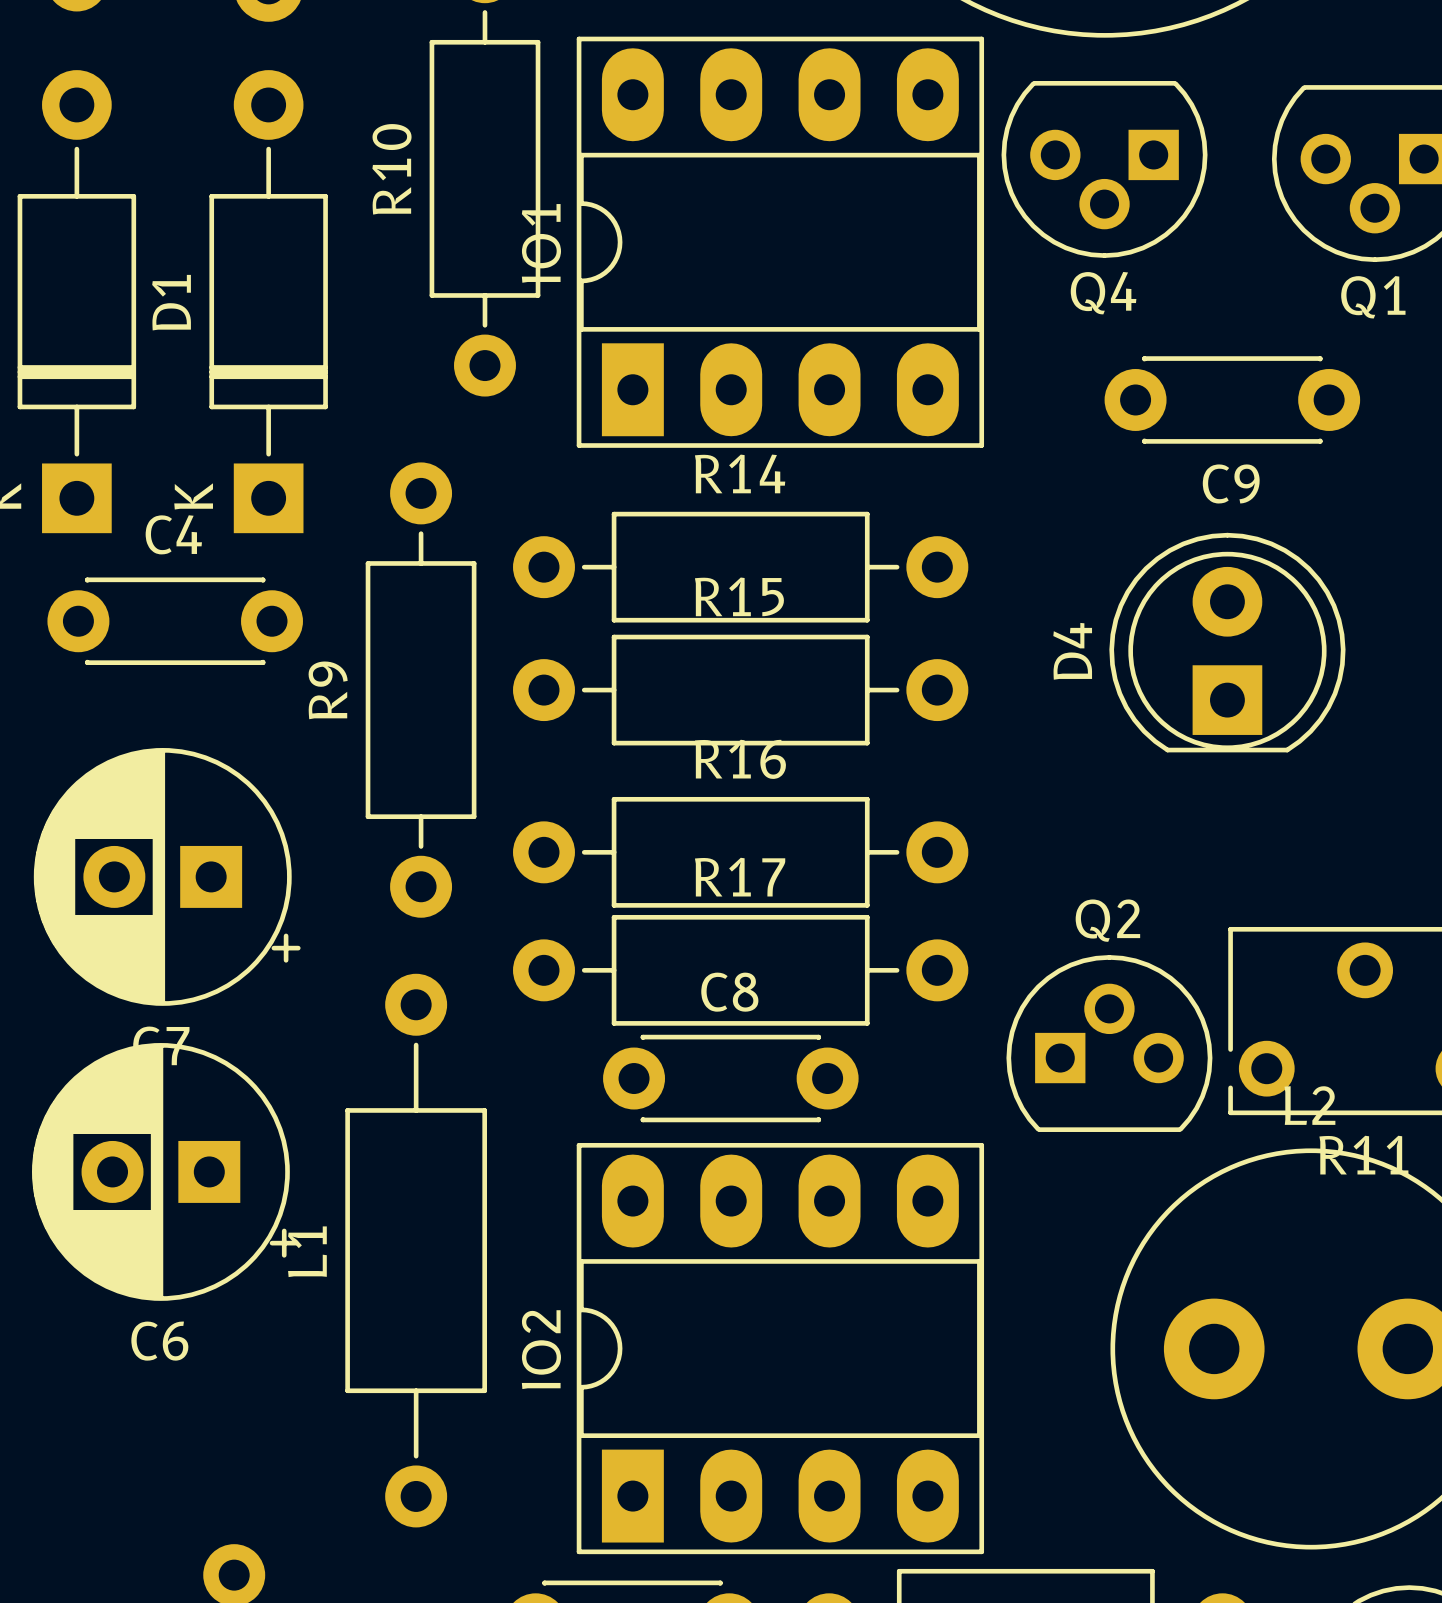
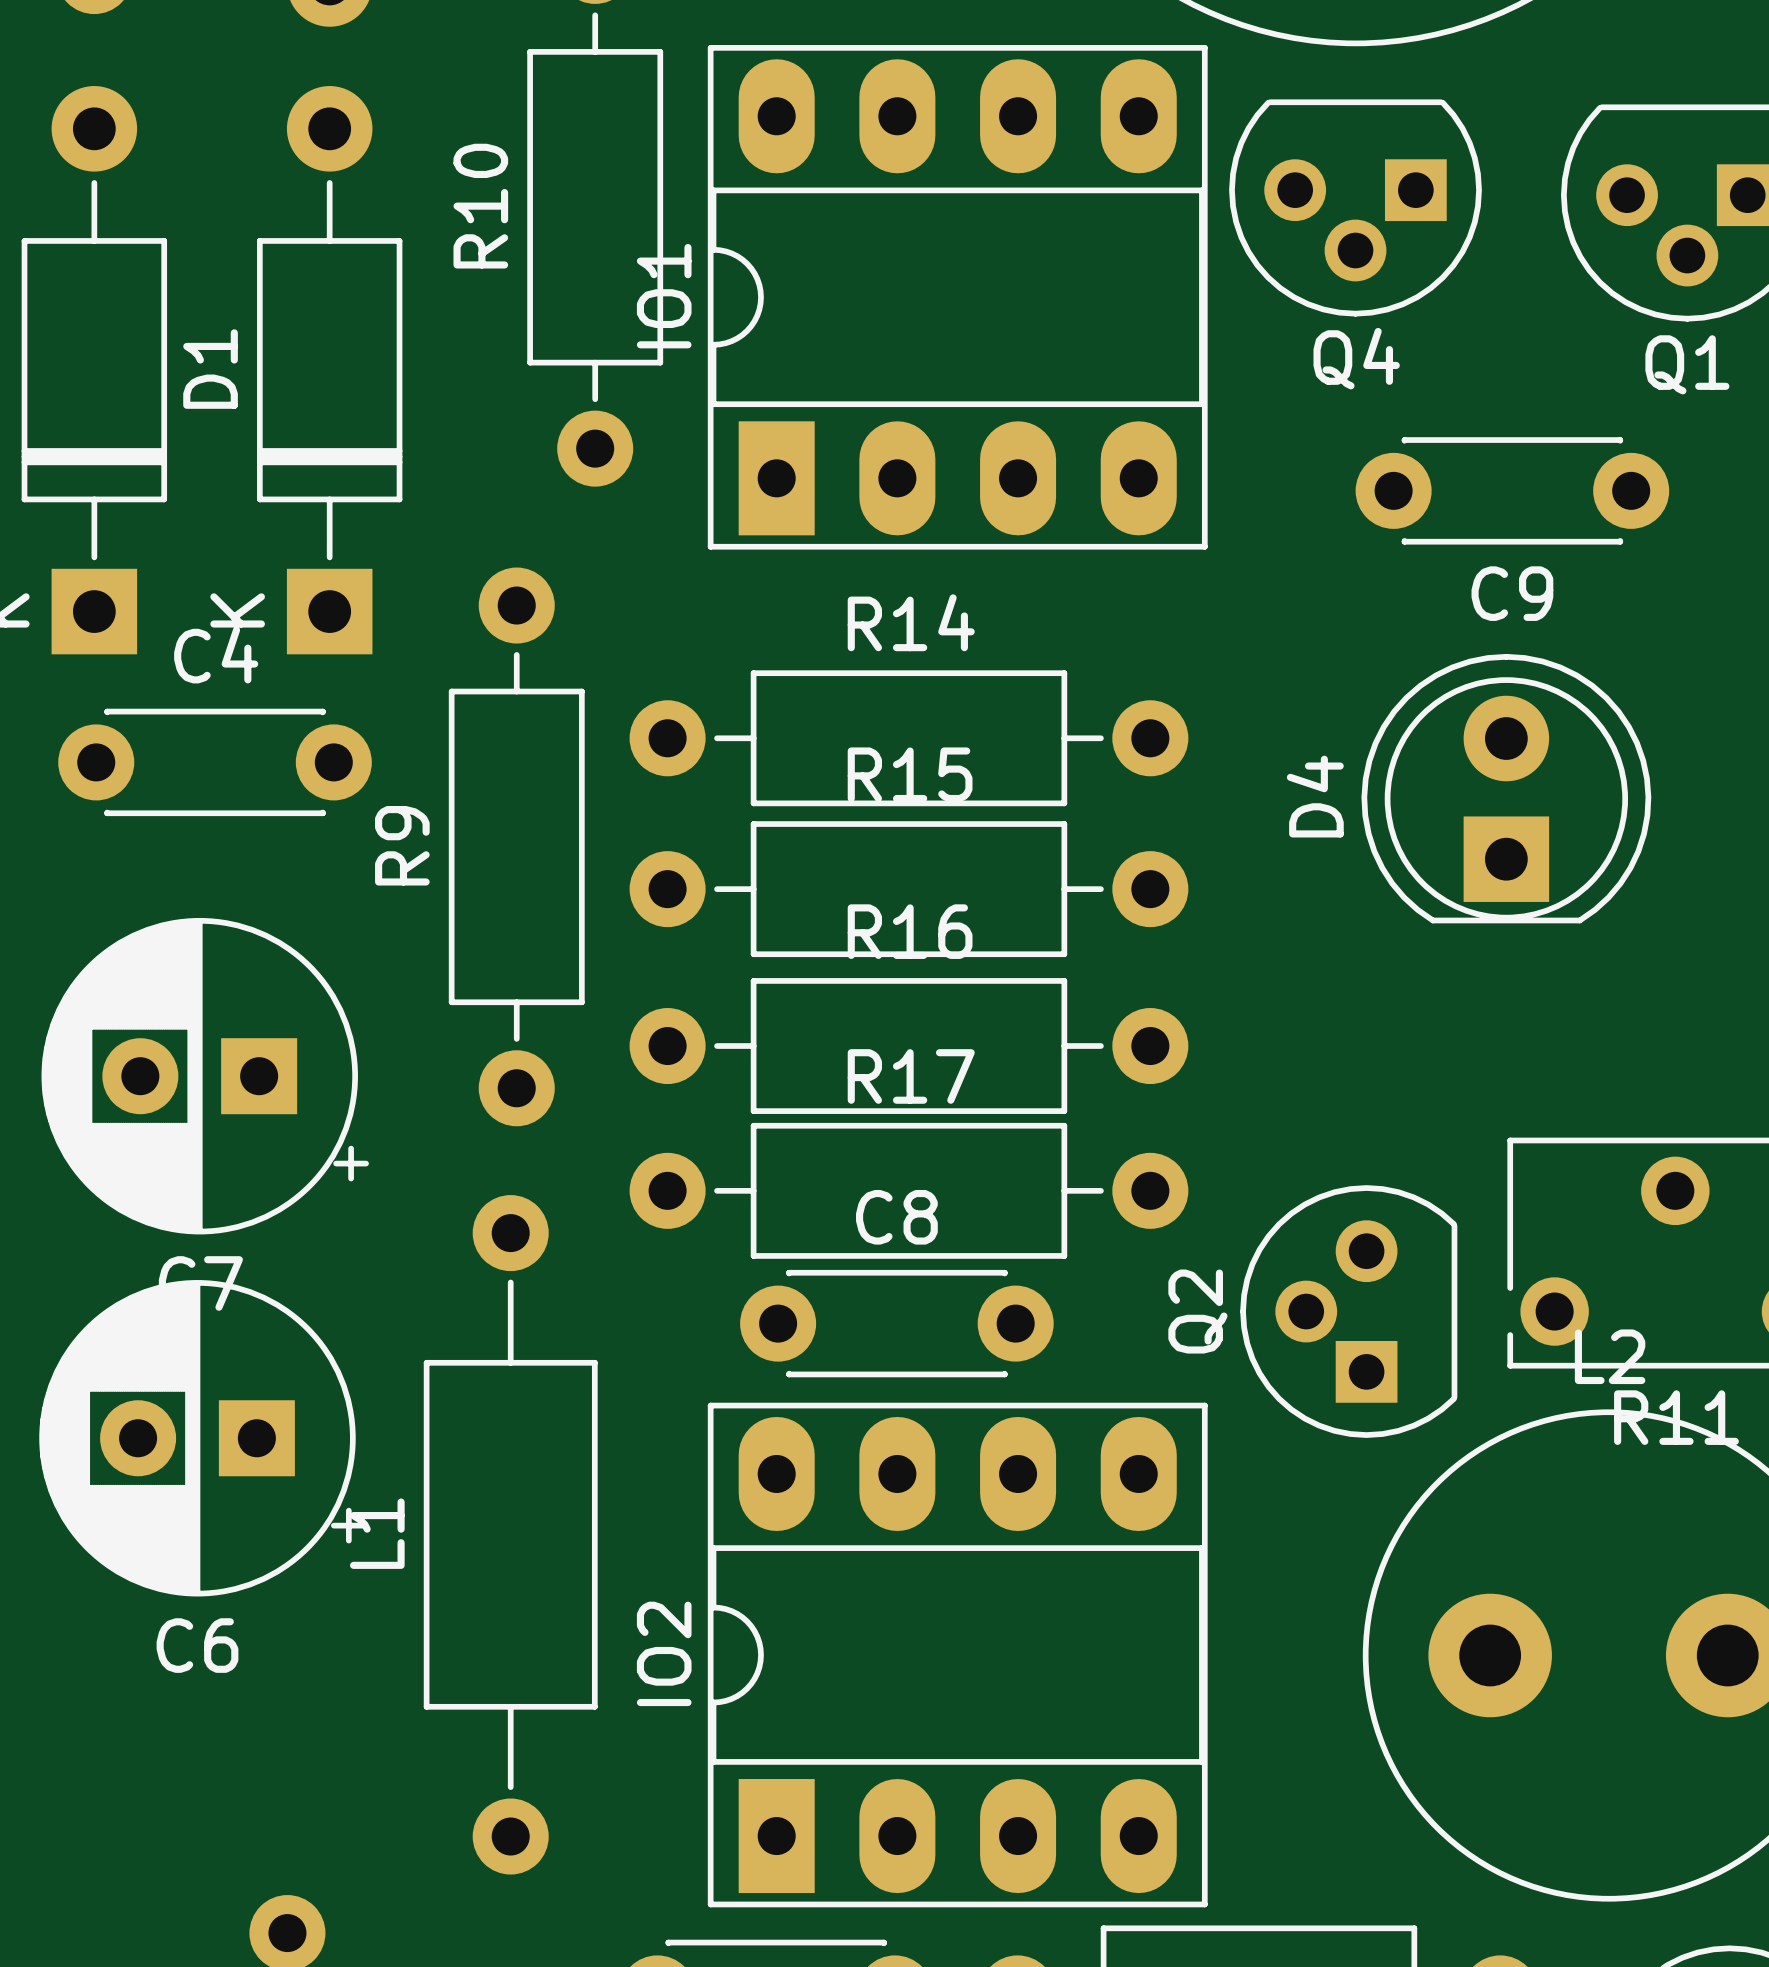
R14 position: (740, 567) -> (908, 738)
R15 position: (740, 690) -> (908, 889)
Q2 rotation: 0° (1109, 1043) -> 90° counterclockwise (1348, 1311)

